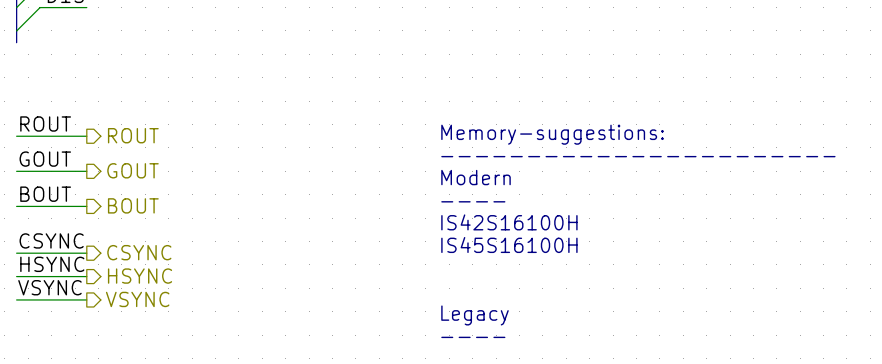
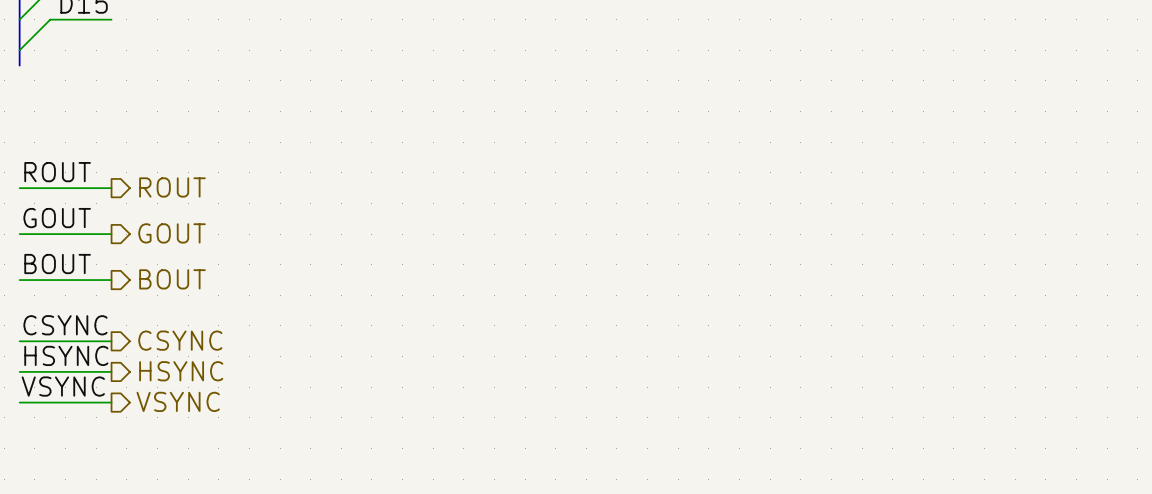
text: Memory-suggestions: (552, 134) -> none
text: ----------------------- (638, 156) -> none
text: Modern (476, 177) -> none
text: ---- (473, 201) -> none
text: IS42S16100H (509, 222) -> none
text: IS45S16100H (509, 245) -> none
text: Legacy (475, 315) -> none
text: ---- (473, 337) -> none

